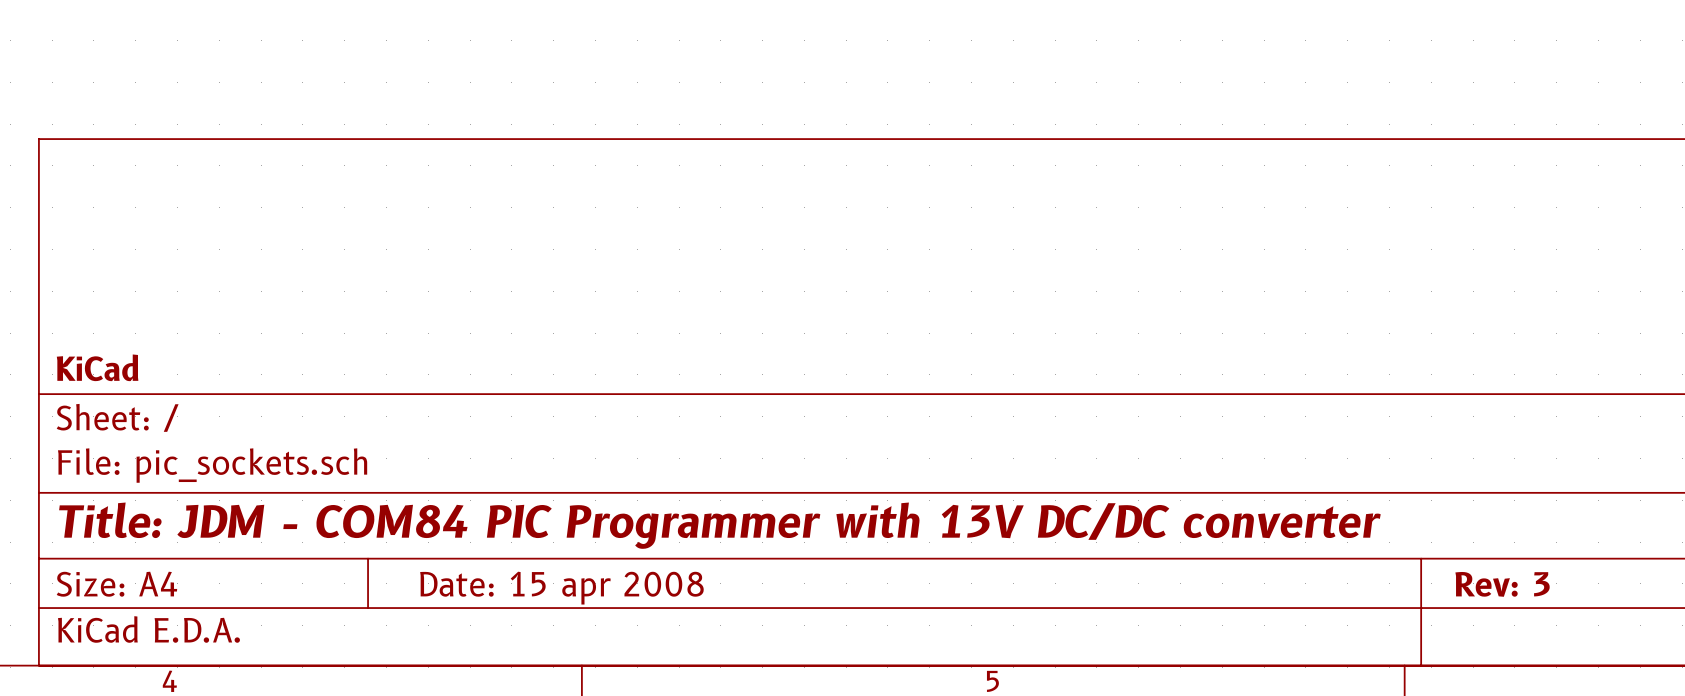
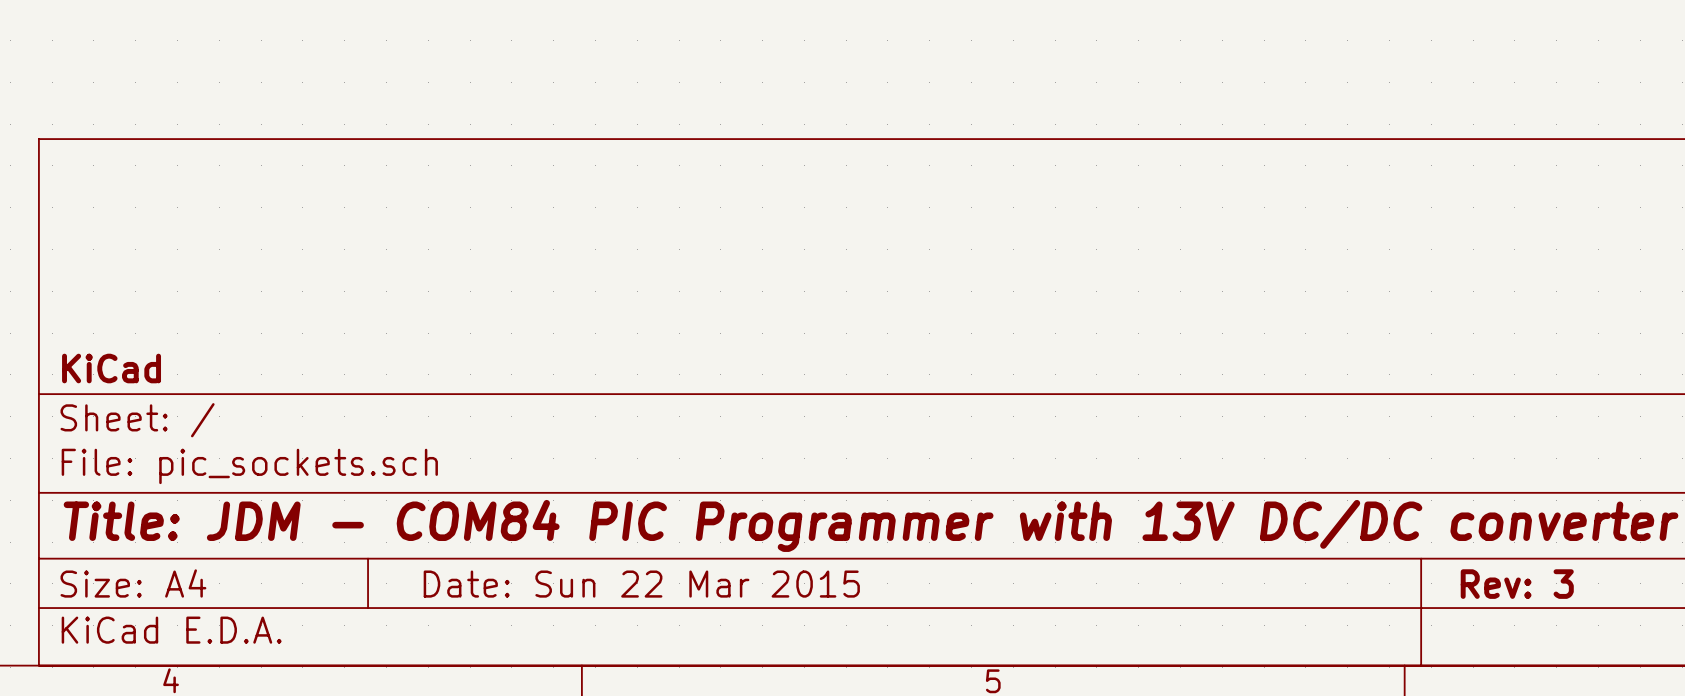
title block: Date: 15 apr 2008 (561, 588) -> Date: Sun 22 Mar 2015 (641, 584)

